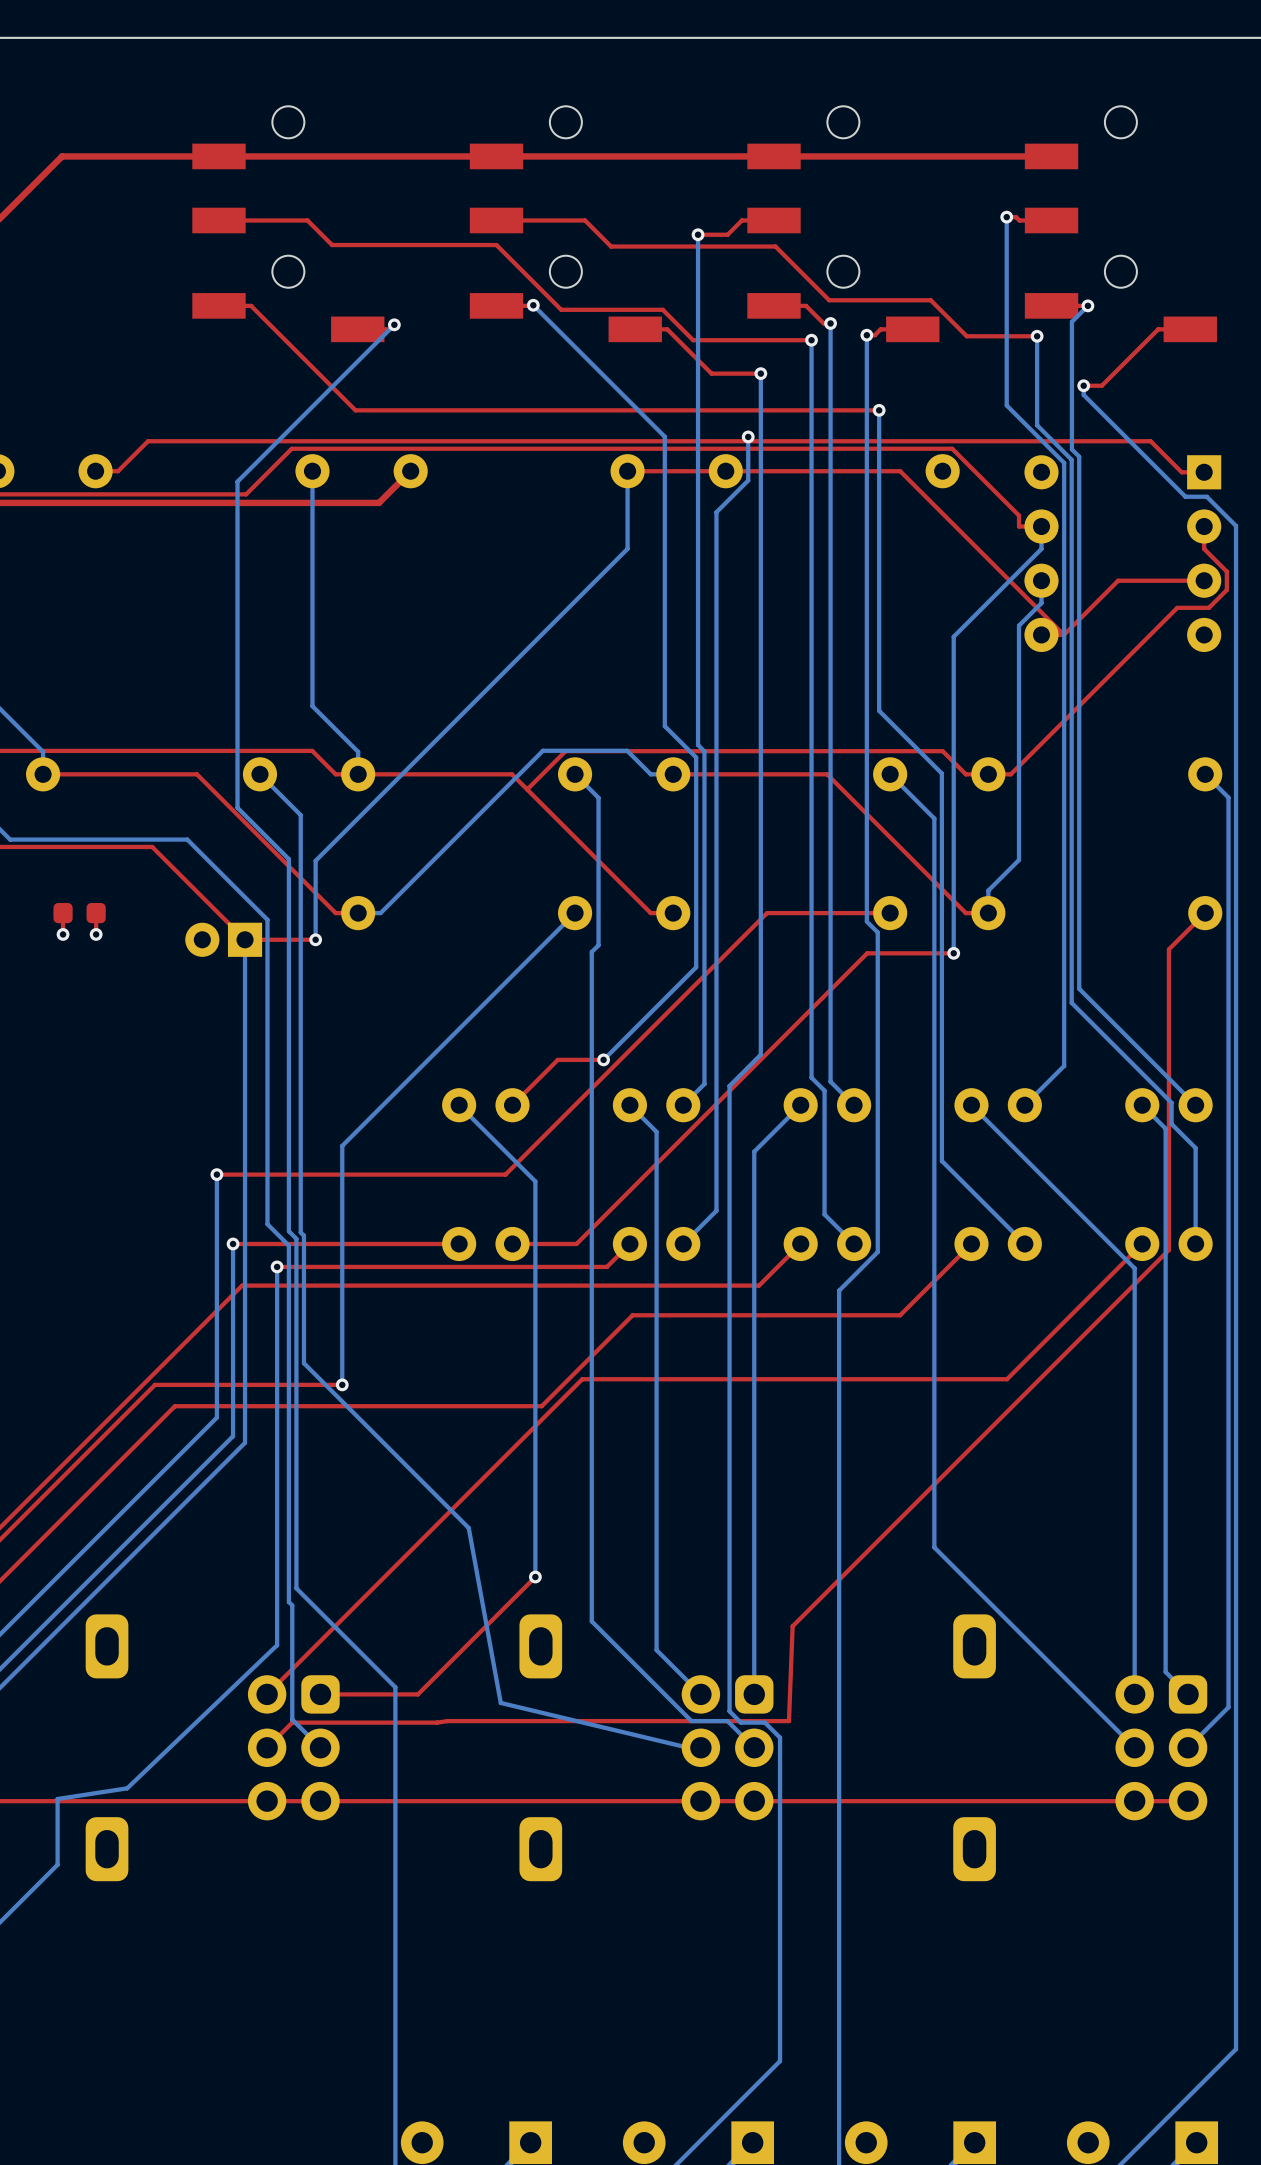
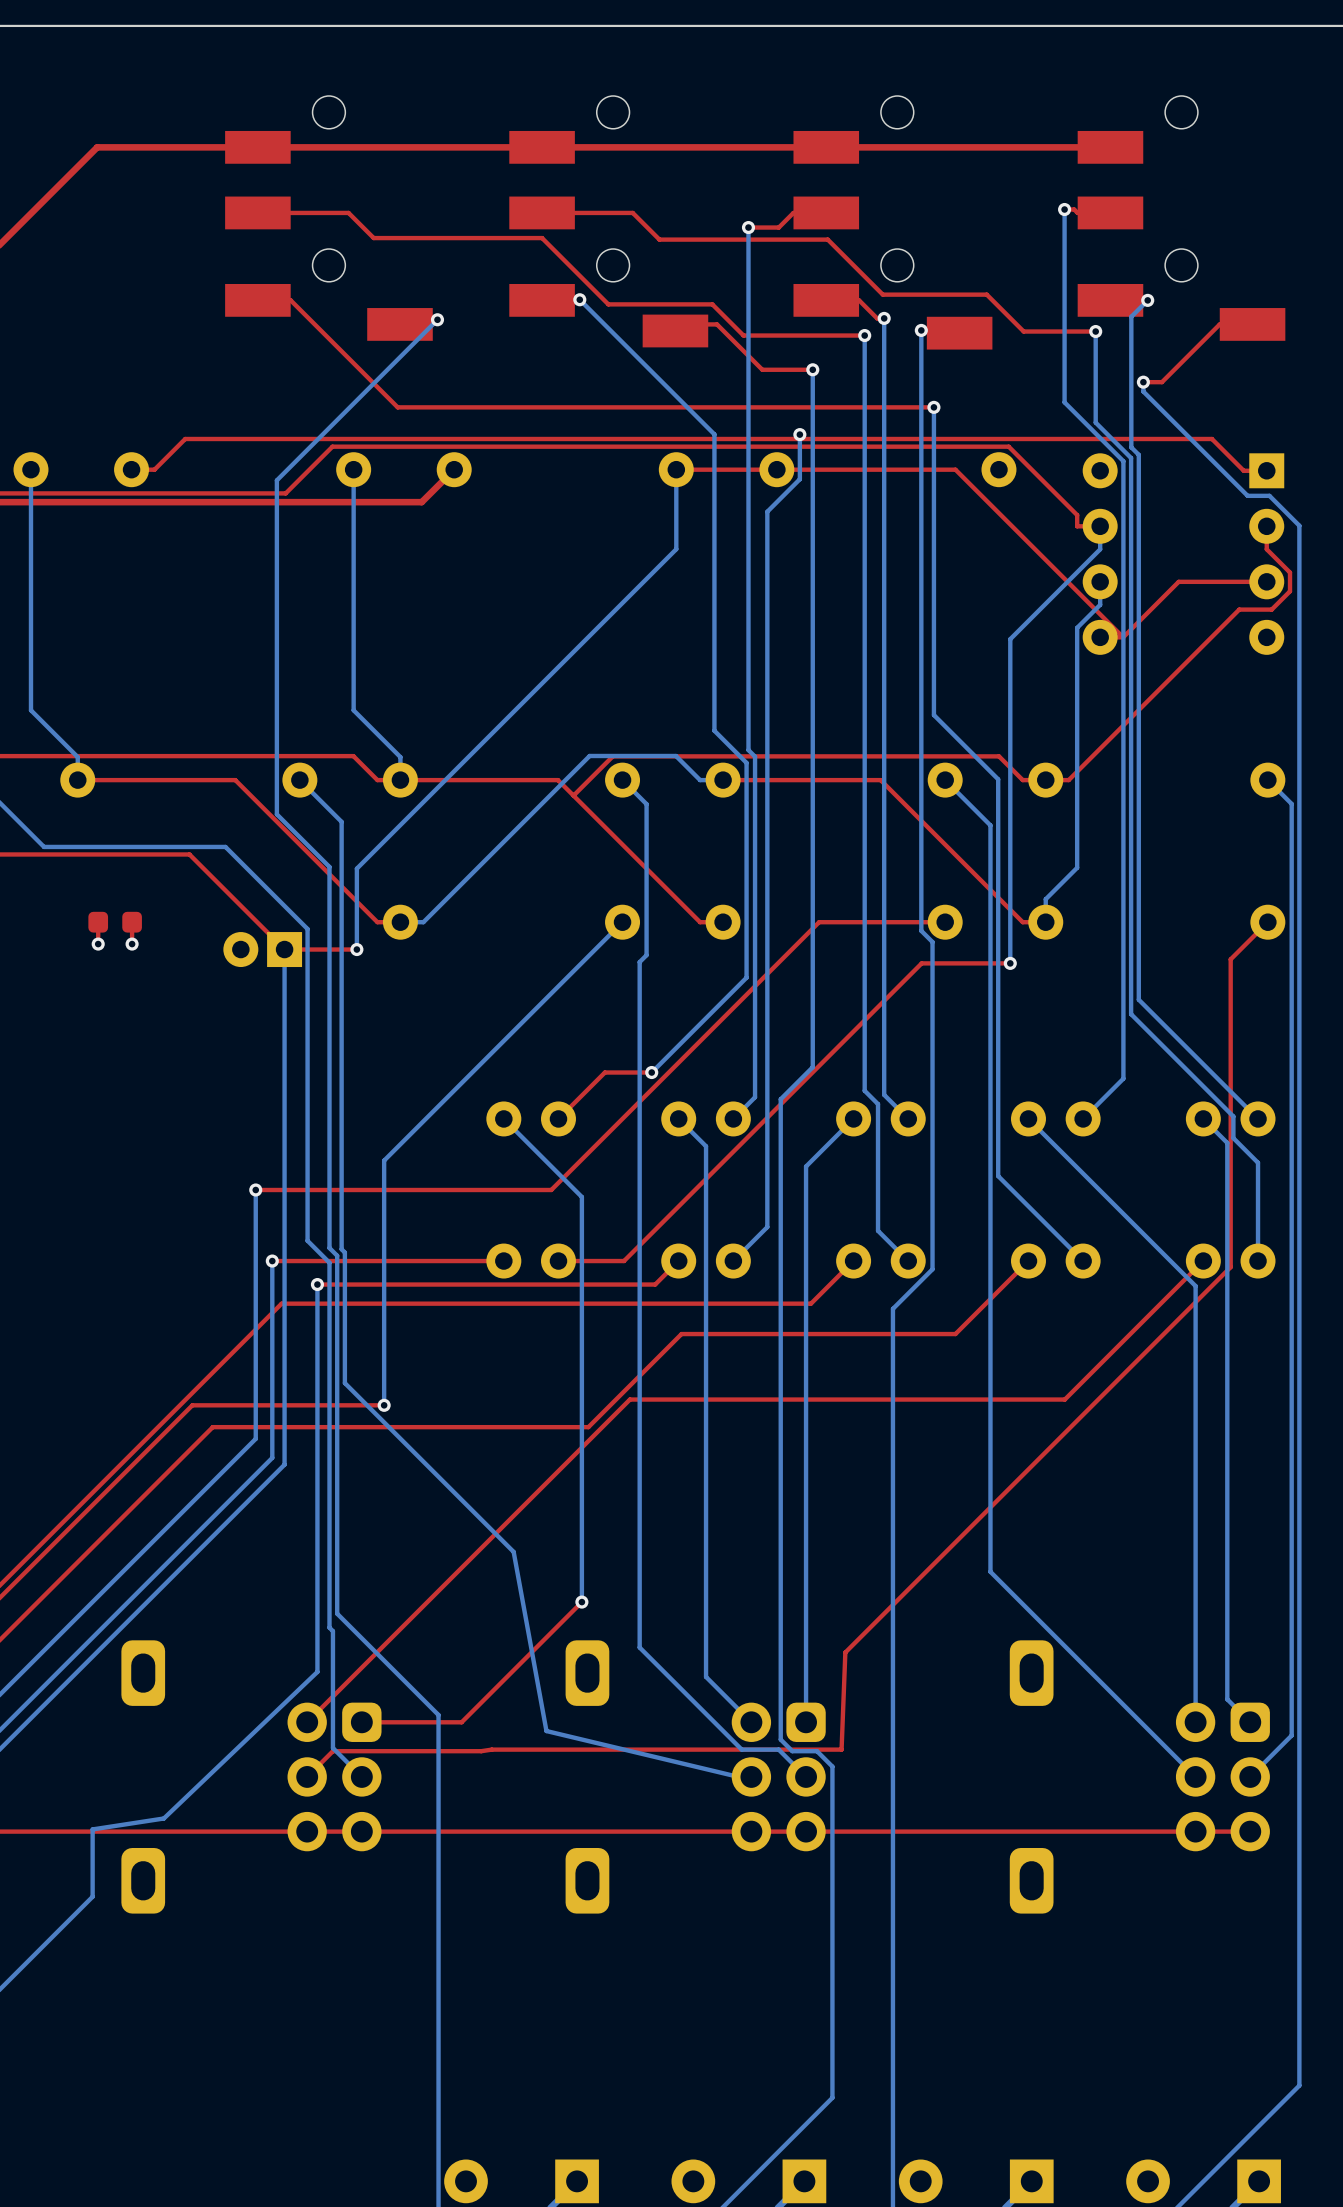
part footprint: [192, 106, 385, 343] -> [225, 95, 433, 341]
part footprint: [469, 106, 662, 343] -> [509, 95, 709, 348]
part footprint: [747, 106, 940, 343] -> [793, 95, 993, 350]
part footprint: [1024, 106, 1217, 343] -> [1077, 95, 1286, 341]

